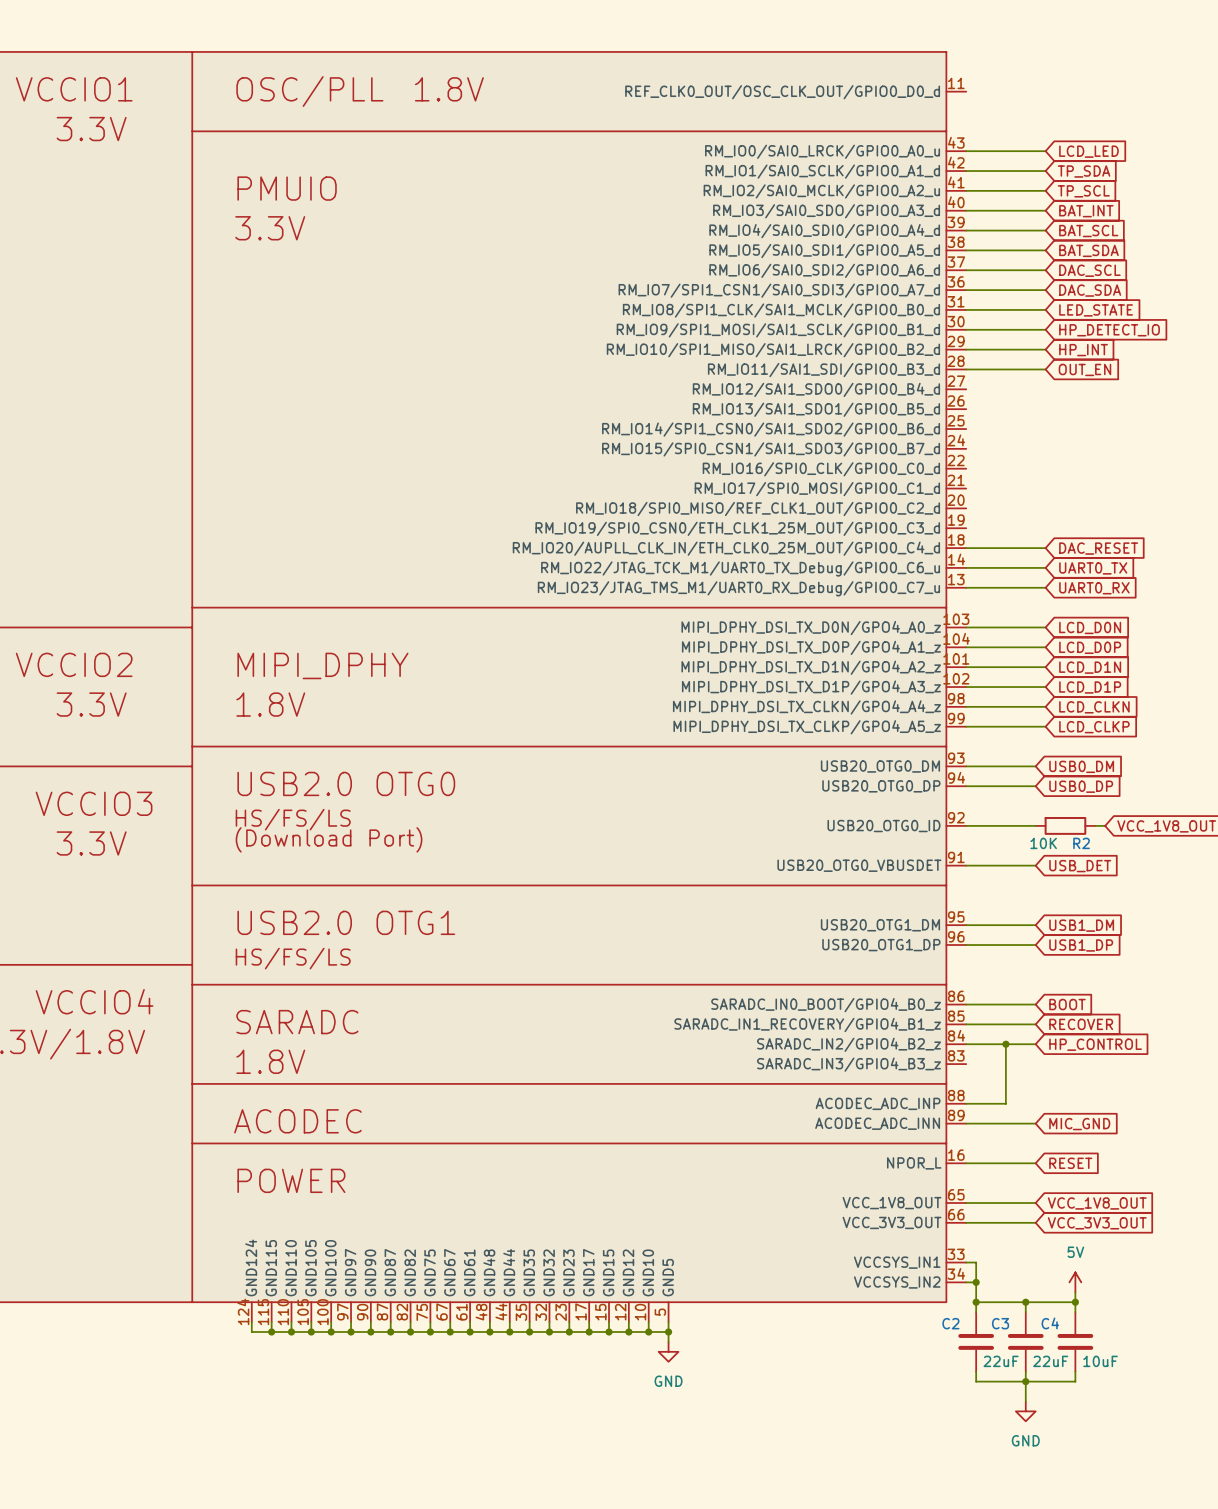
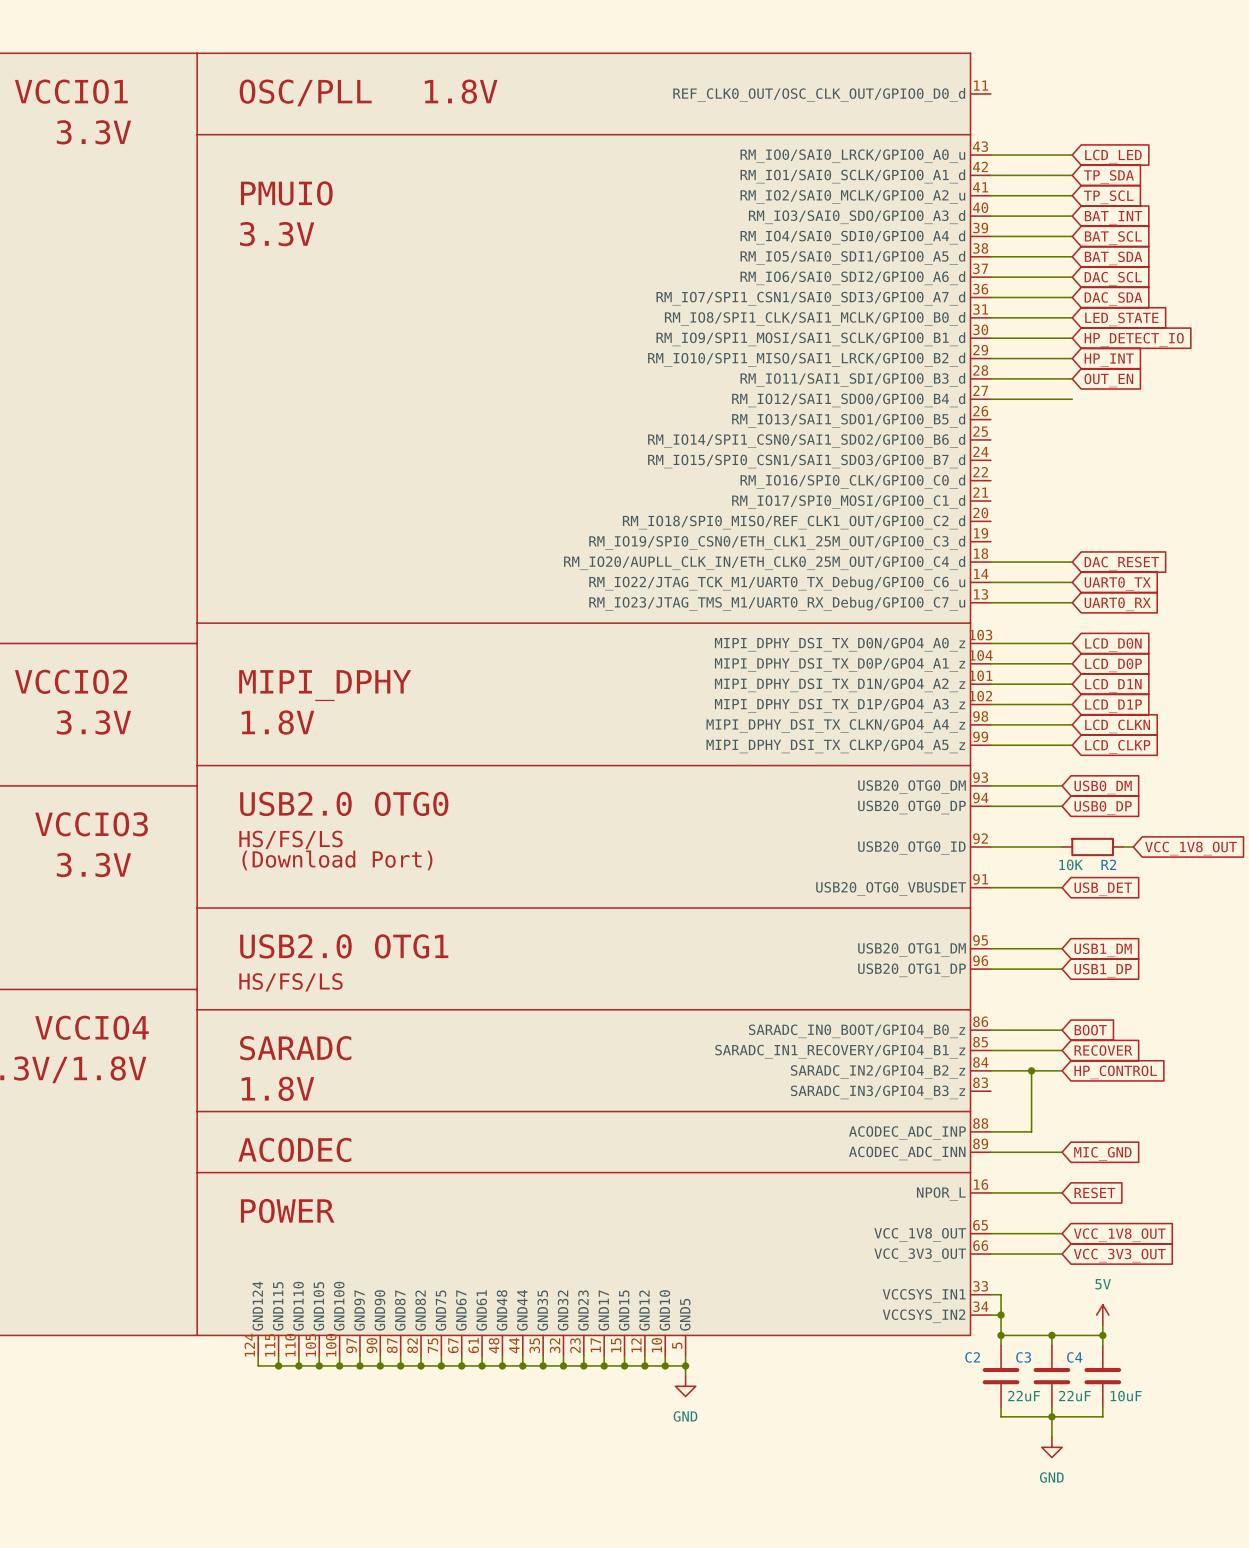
wire: none -> (990, 399) (1072, 399)

